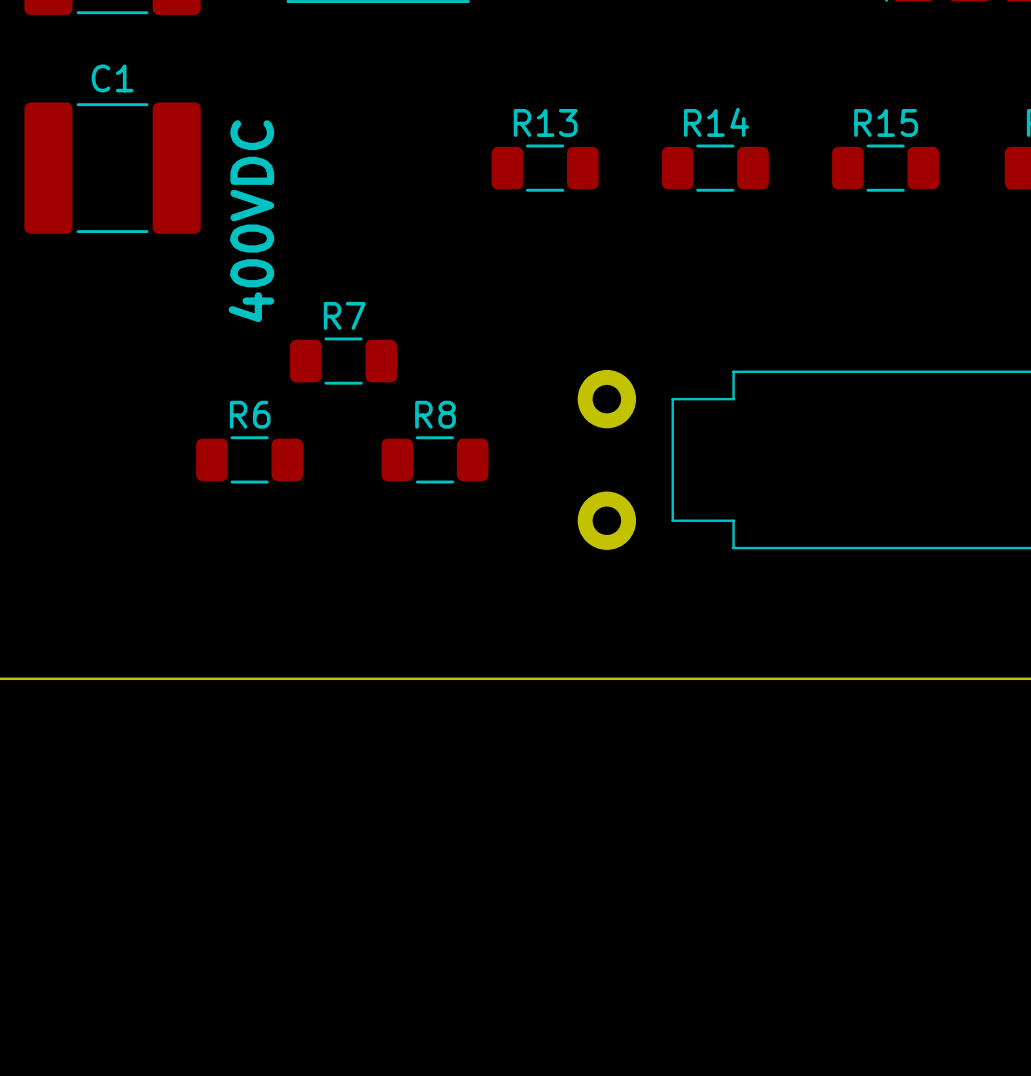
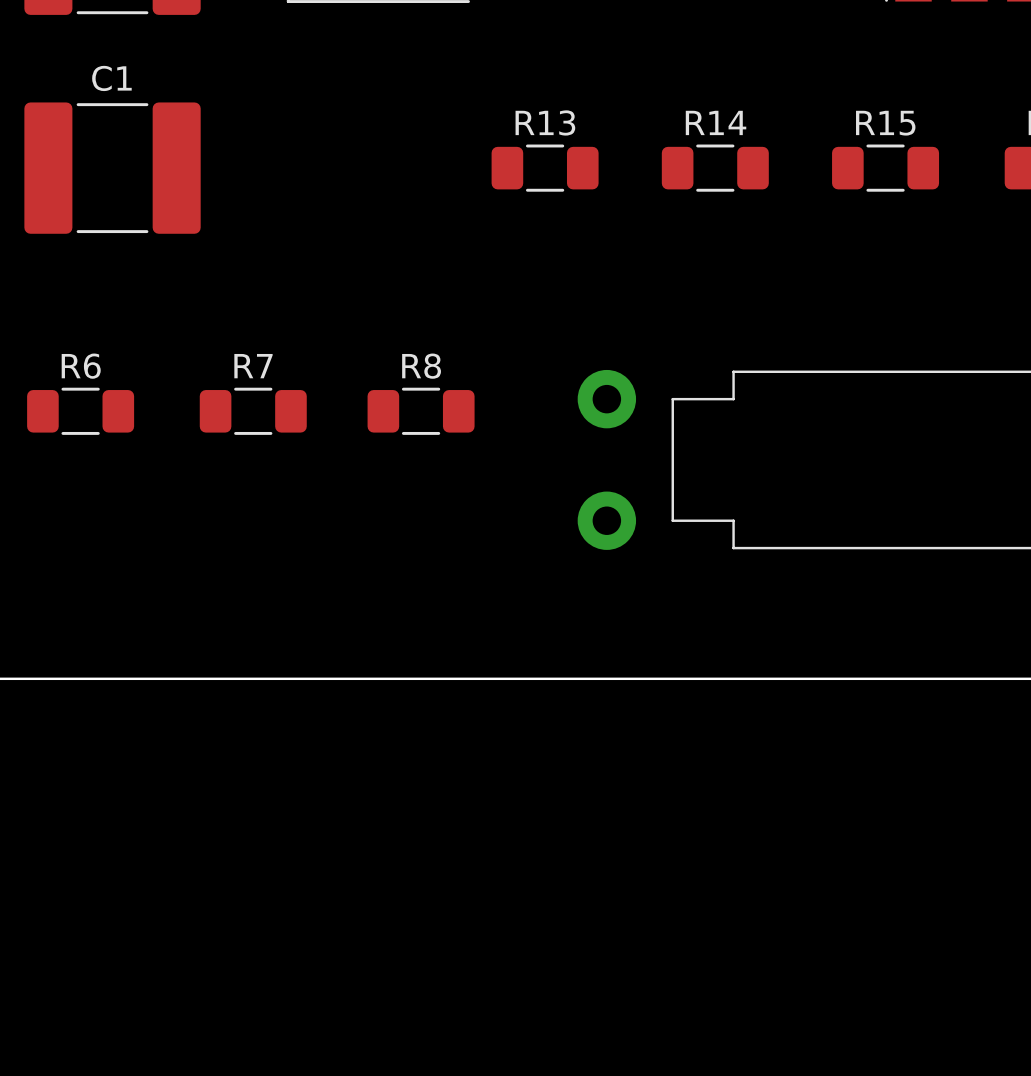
text: 400VDC (251, 221) -> none
R7 position: (343, 361) -> (253, 411)
R6 position: (249, 459) -> (80, 411)
R8 position: (434, 459) -> (421, 411)

